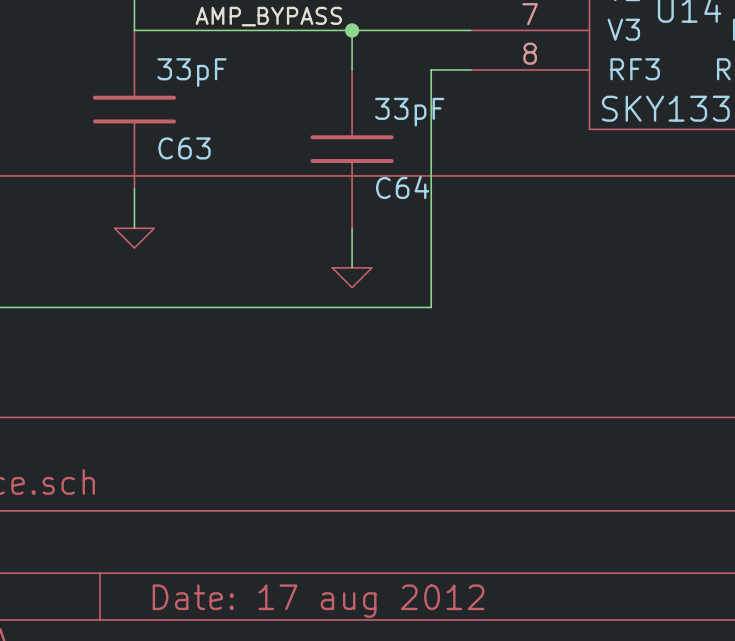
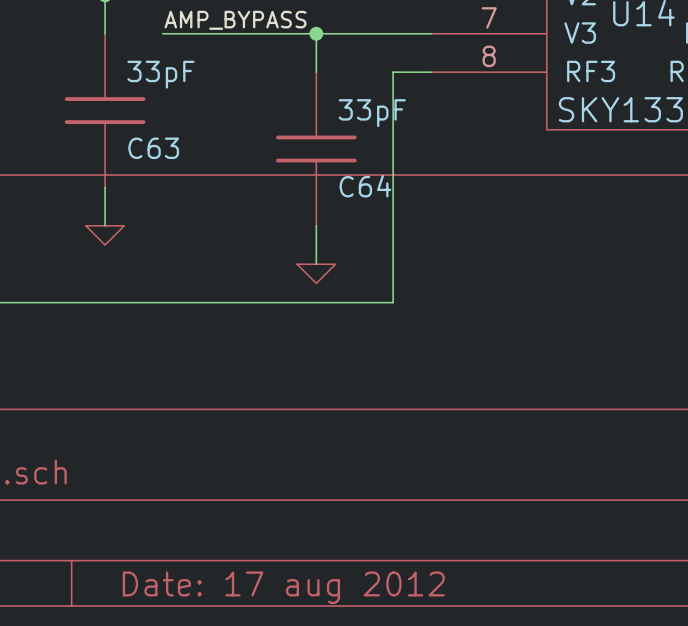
wire: (134, 30) (193, 30) -> none

